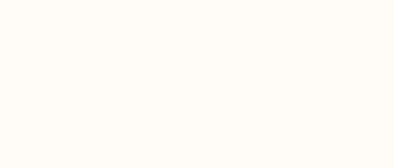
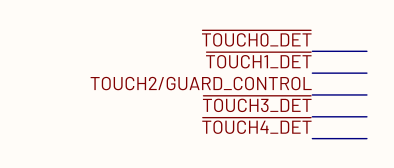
label: none -> ~{TOUCH0_DET} (256, 38)
wire: none -> (312, 51) (366, 51)
label: none -> ~{TOUCH1_DET} (258, 60)
wire: none -> (312, 73) (366, 73)
label: none -> TOUCH2/GUARD_CONTROL (201, 83)
wire: none -> (312, 94) (366, 94)
label: none -> ~{TOUCH3_DET} (257, 103)
wire: none -> (312, 116) (366, 116)
label: none -> ~{TOUCH4_DET} (256, 125)
wire: none -> (312, 138) (366, 138)

